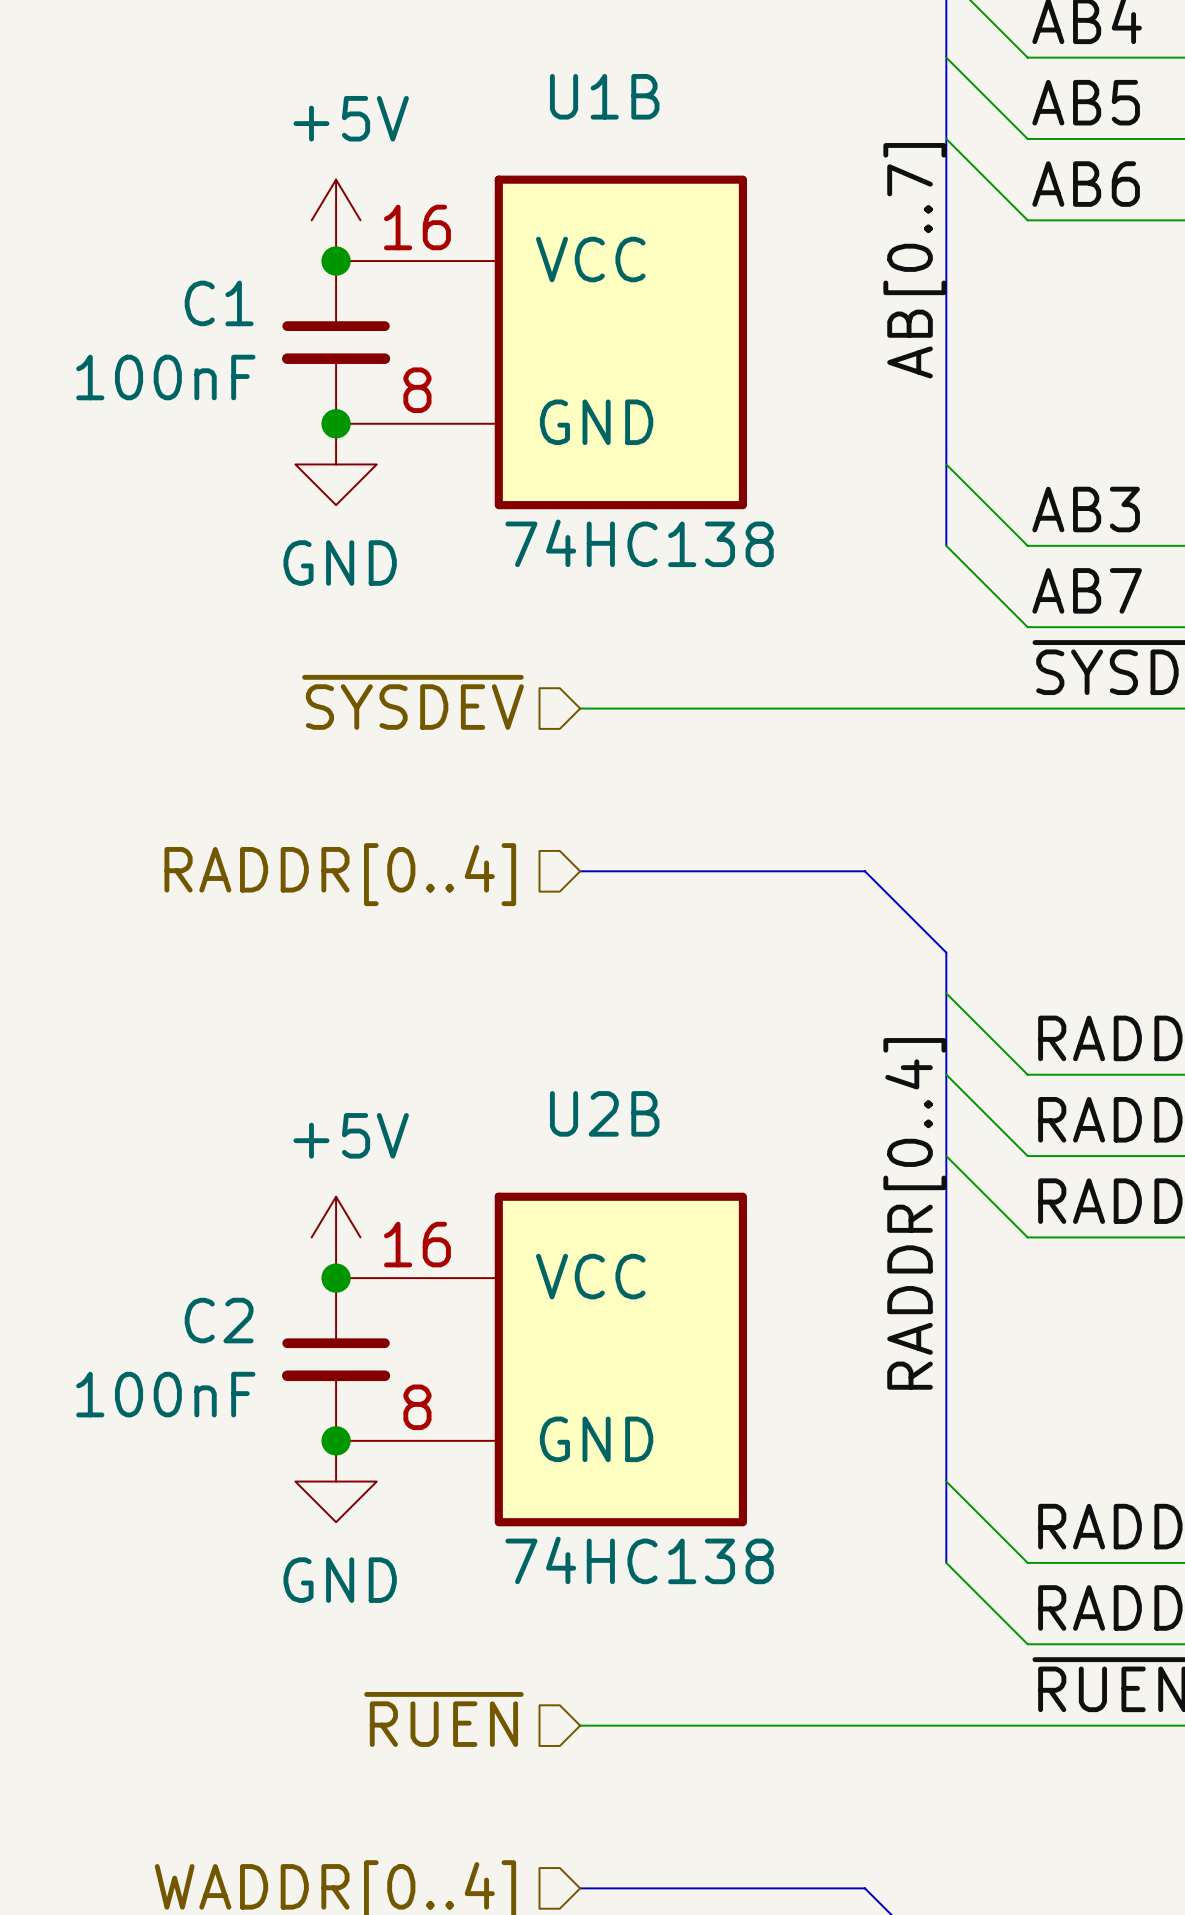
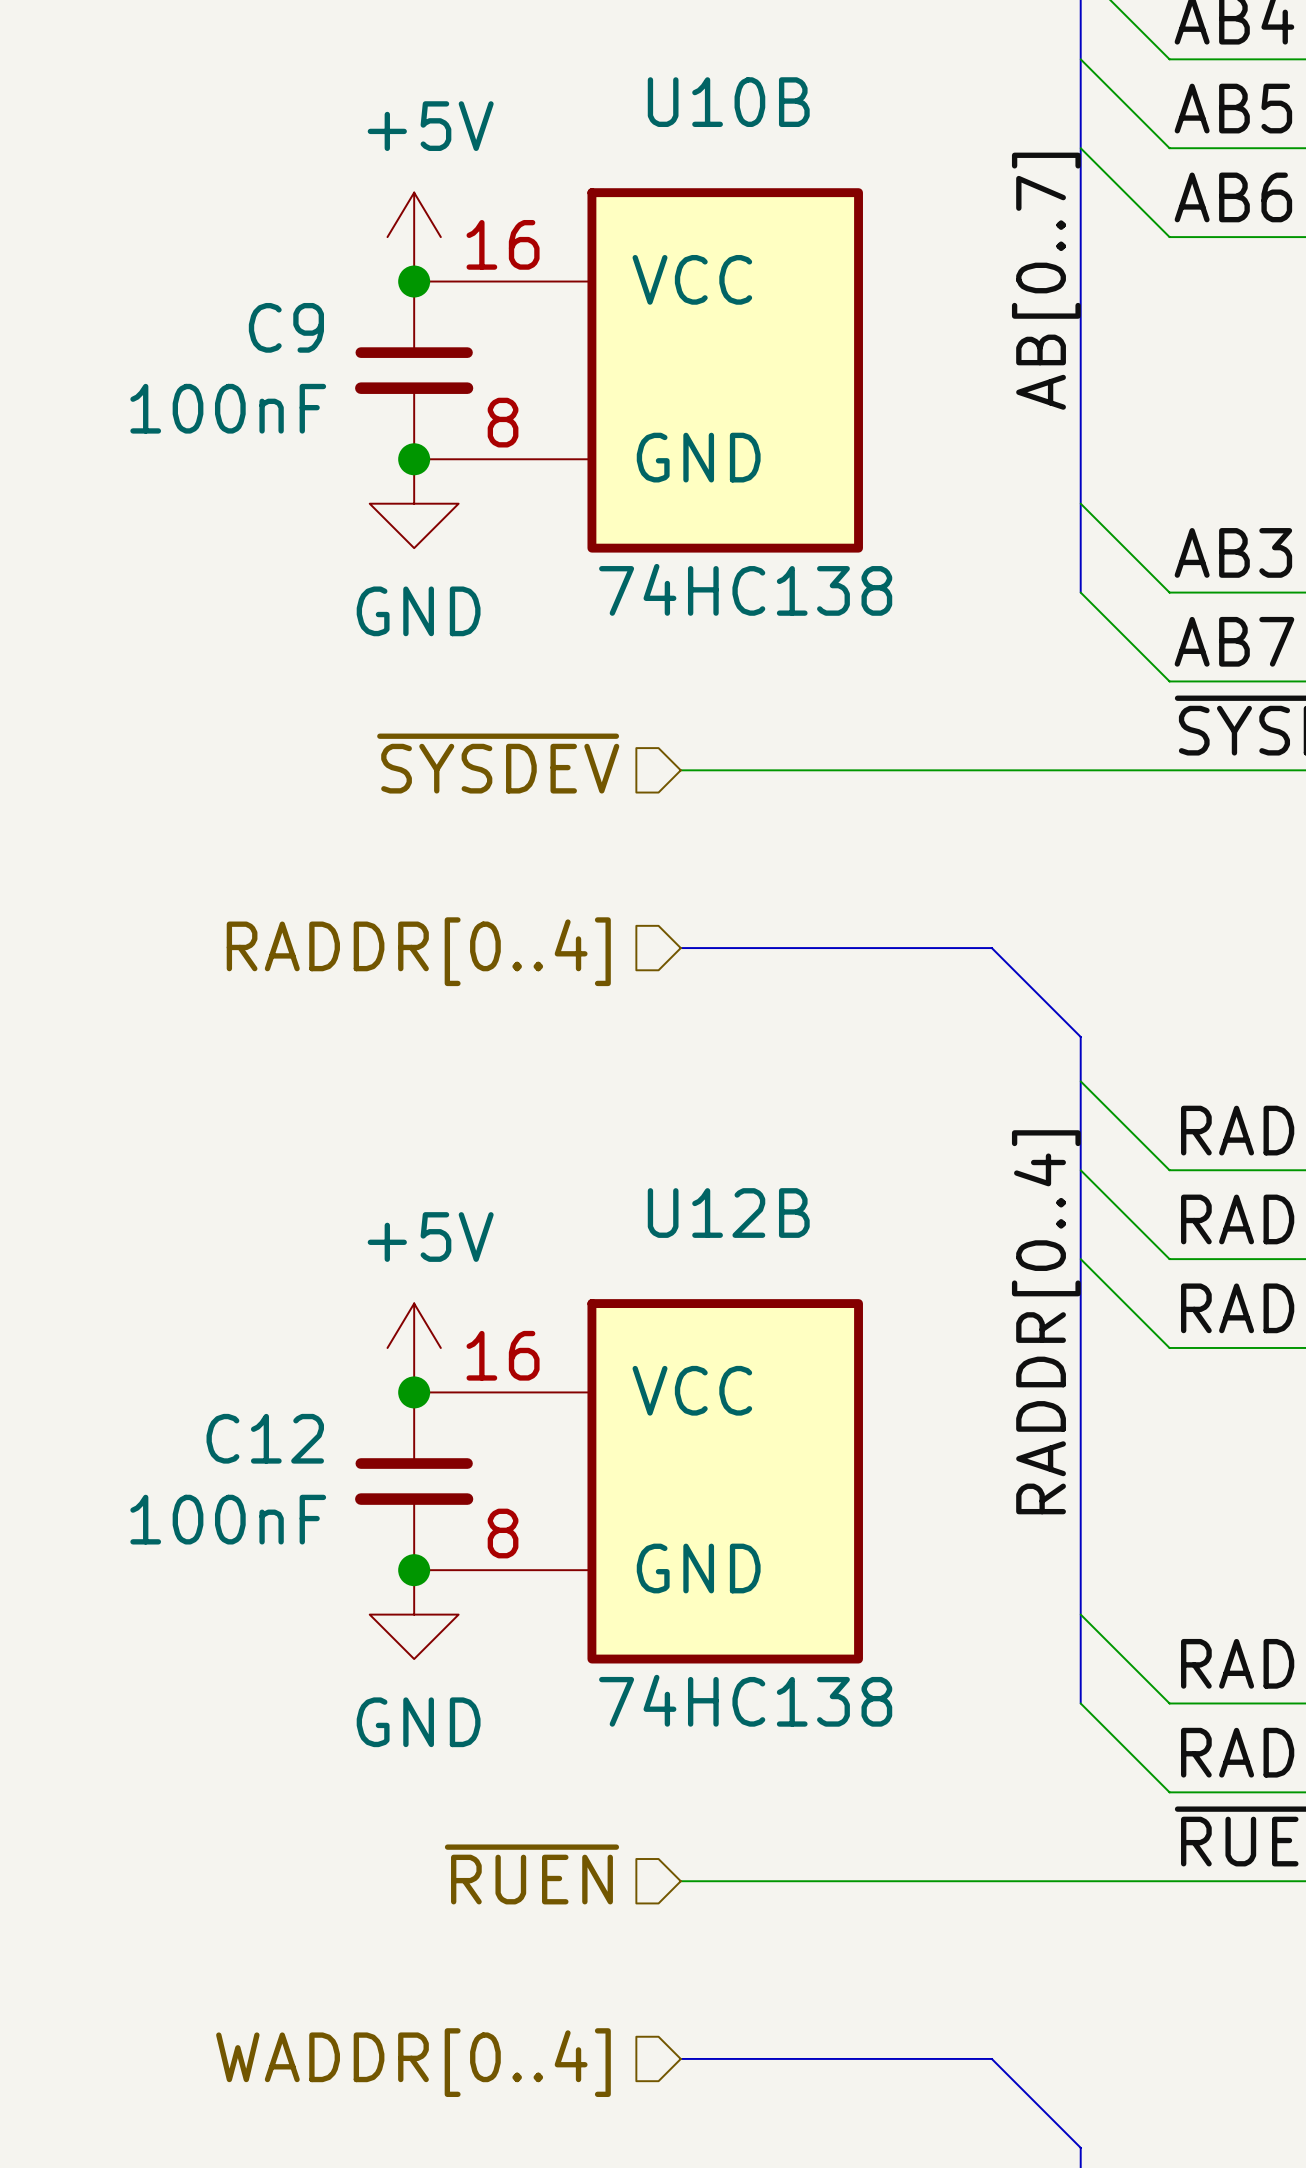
U1B name: U1B (604, 96) -> U10B (728, 102)
C1 name: C1 (219, 303) -> C9 (286, 327)
U2B name: U2B (604, 1113) -> U12B (728, 1213)
C2 name: C2 (219, 1320) -> C12 (265, 1438)

